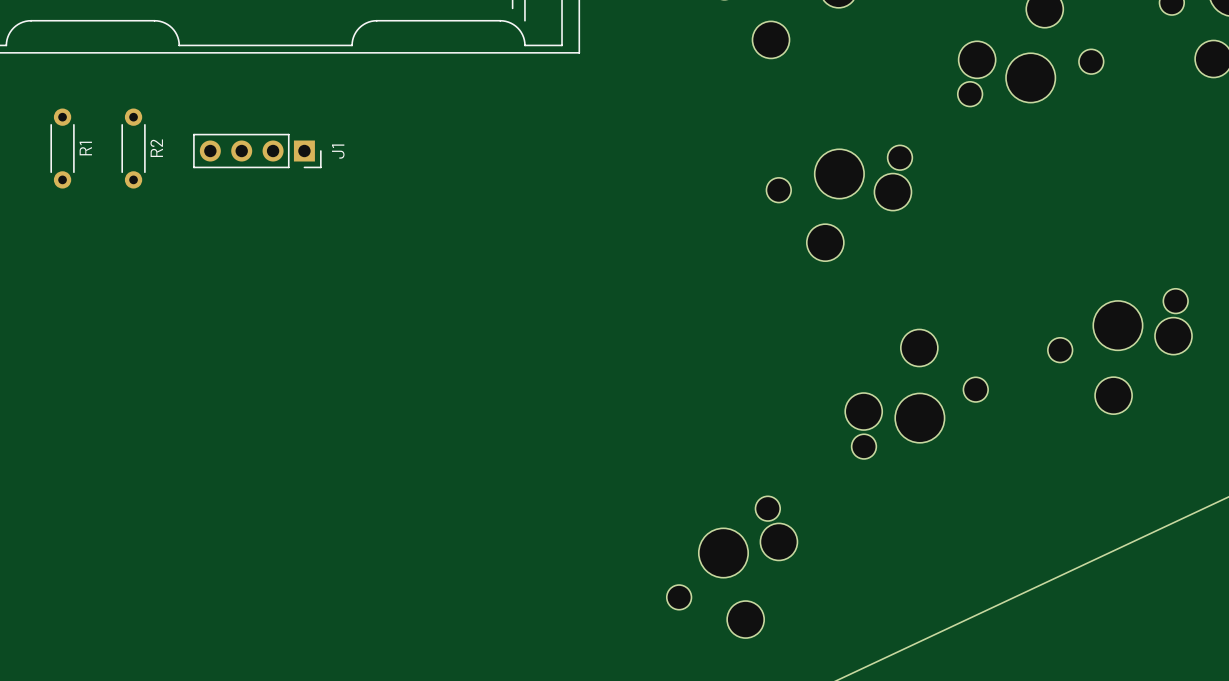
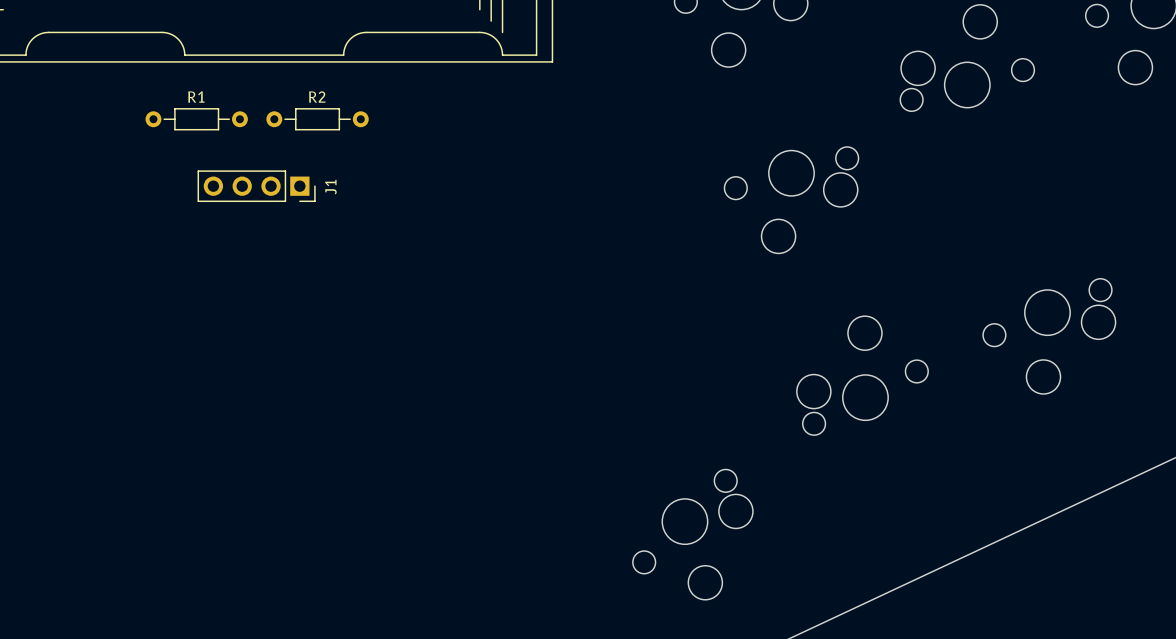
R1 footprint: [50, 108, 75, 189] -> [145, 108, 248, 131]
R2 footprint: [121, 108, 146, 189] -> [266, 108, 369, 131]
R1 name position: R1 (85, 148) -> R1 (196, 97)
R2 name position: R2 (156, 148) -> R2 (317, 97)
J1 position: (257, 151) -> (256, 186)

